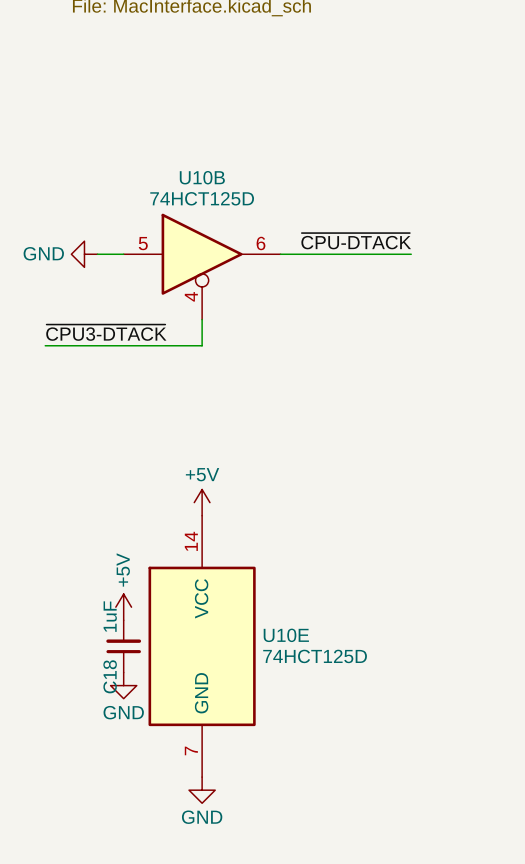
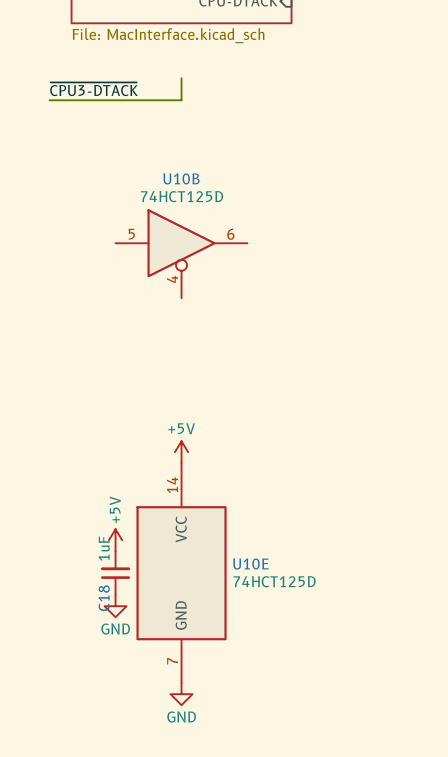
wire: none -> (181, 78) (181, 100) (49, 100)
label: none -> ~{CPU3-DTACK} (93, 89)
label: ~{CPU-DTACK} (356, 241) -> none
power symbol: GND (84, 254) -> none
wire: (97, 254) (123, 254) -> none
wire: (280, 254) (411, 254) -> none
wire: (202, 319) (202, 345) (45, 345) -> none
label: ~{CPU3-DTACK} (106, 332) -> none

